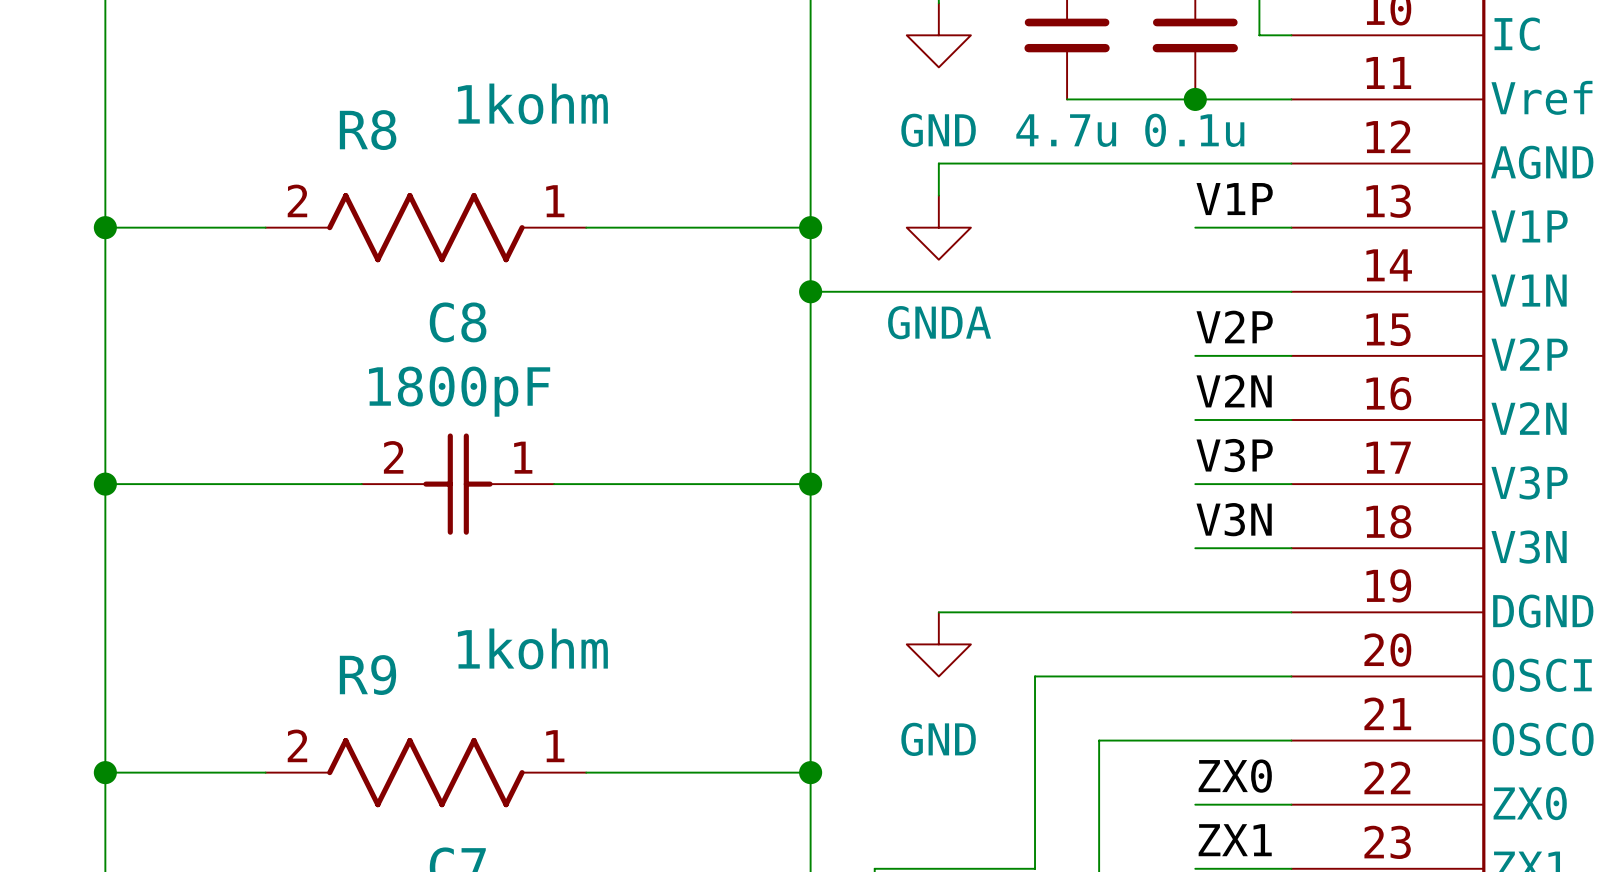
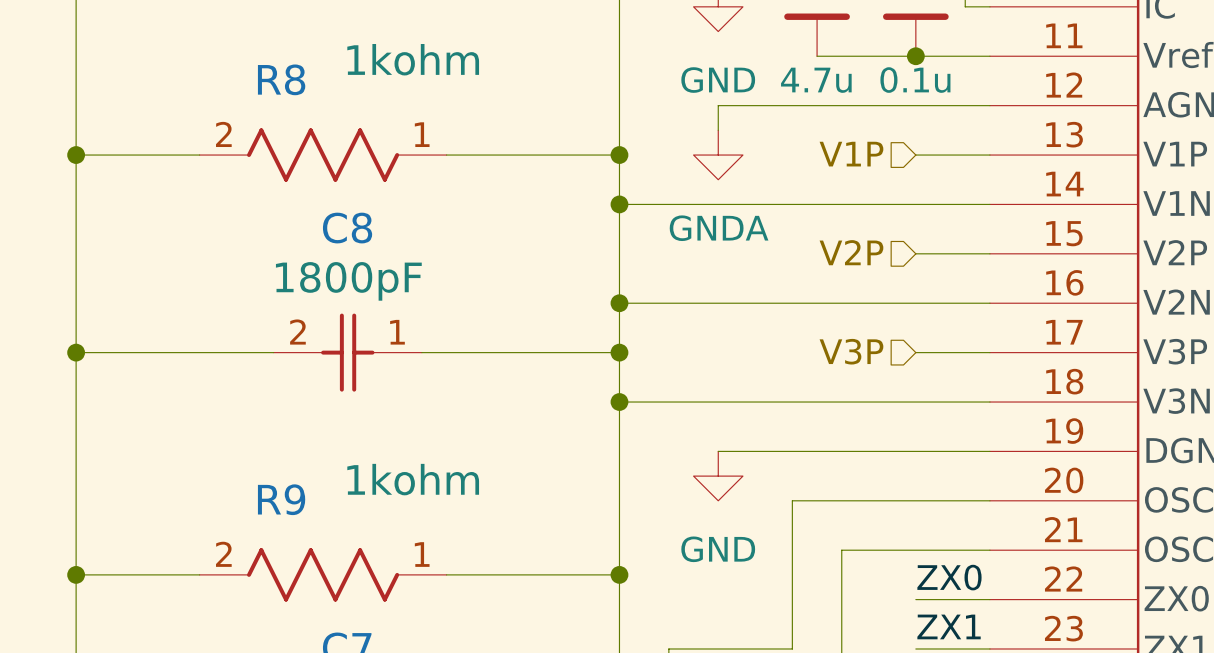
label: V1P (1234, 199) -> none
hierarchical label: none -> V1P (851, 154)
label: V2P (1234, 326) -> none
hierarchical label: none -> V2P (851, 252)
label: V2N (1234, 391) -> none
wire: none -> (619, 303) (915, 303)
junction: none -> (619, 303)
label: V3P (1234, 455) -> none
hierarchical label: none -> V3P (851, 351)
label: V3N (1234, 519) -> none
wire: none -> (619, 402) (915, 402)
junction: none -> (619, 402)

